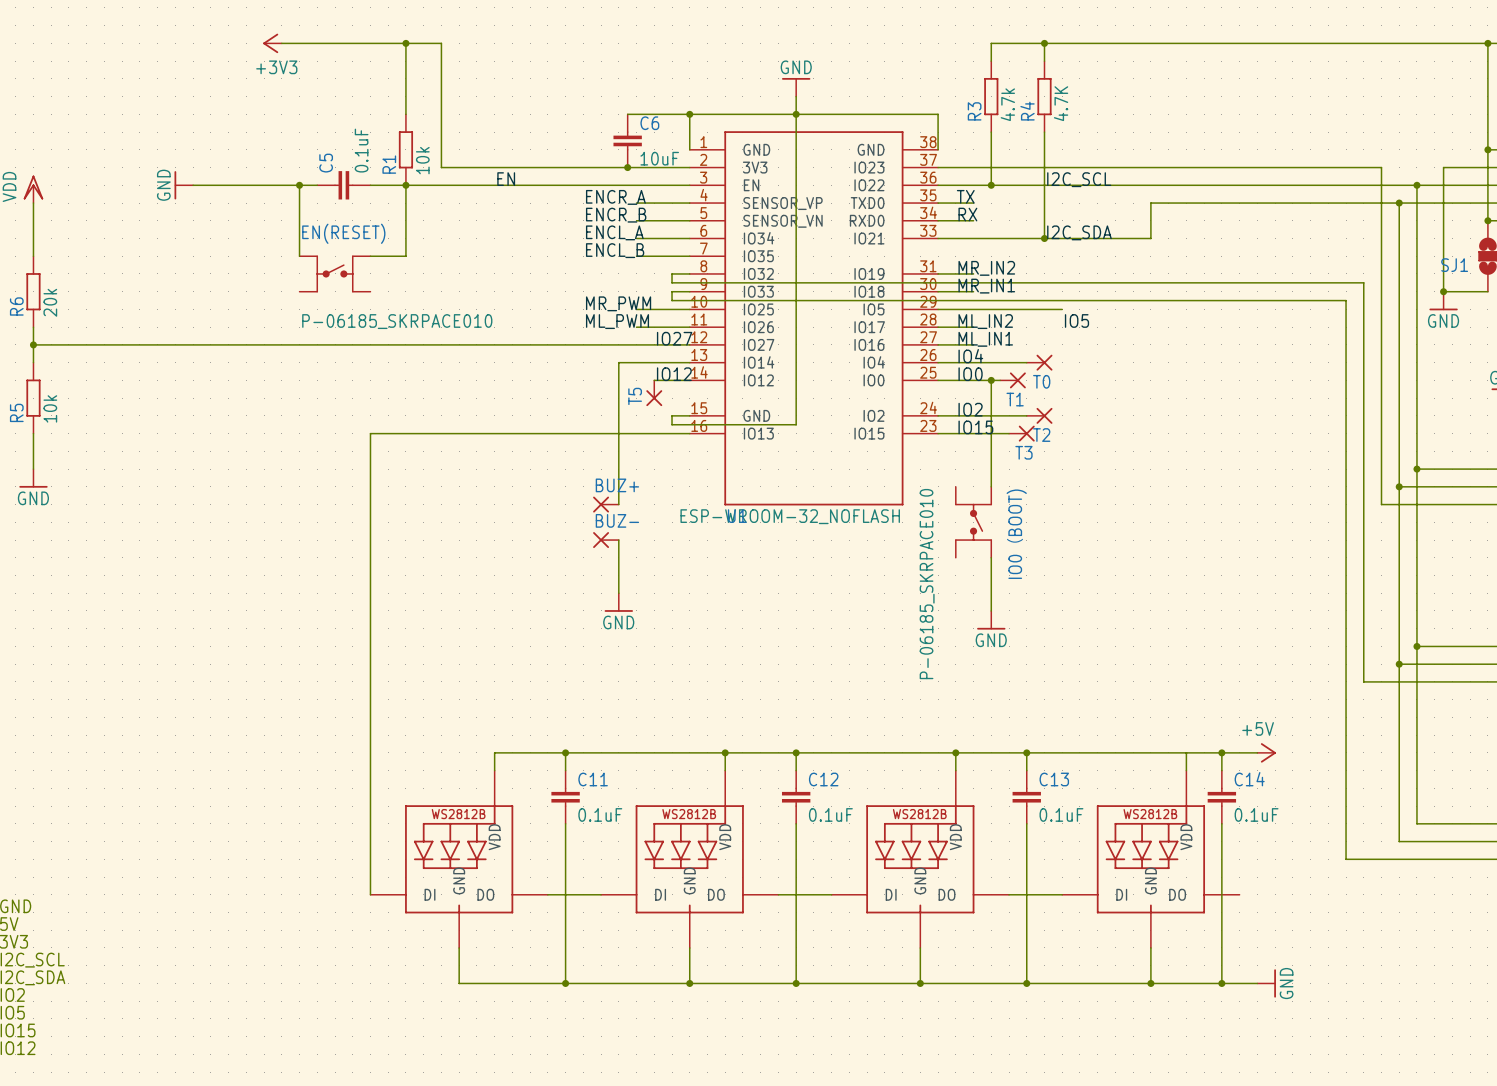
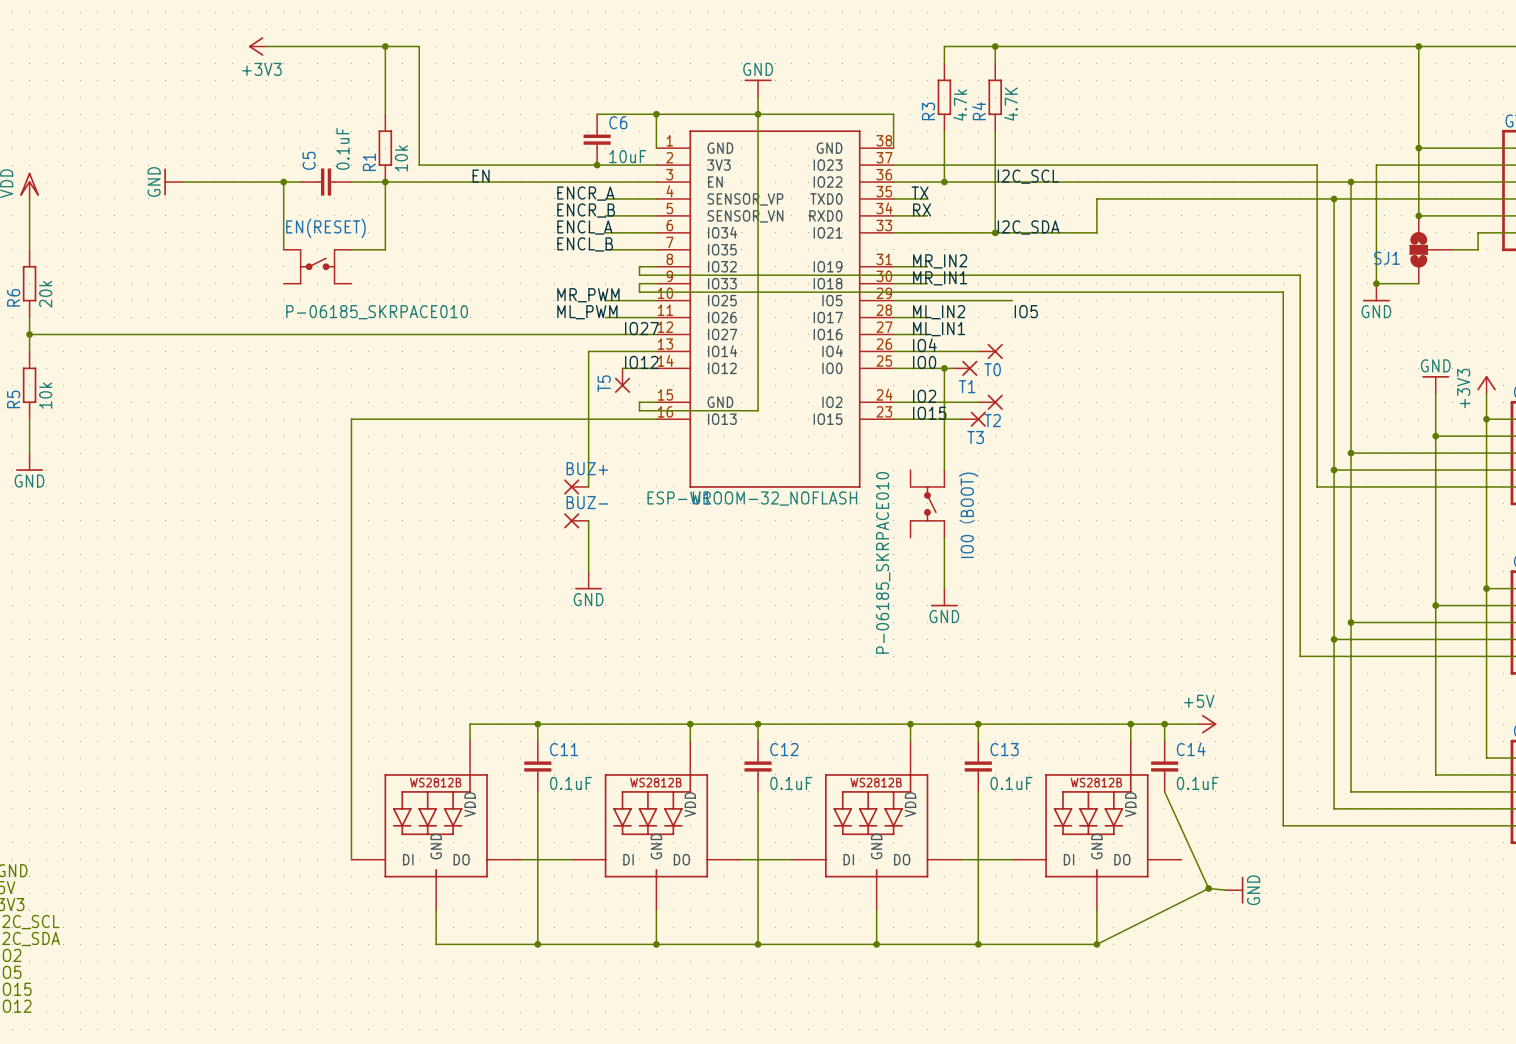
junction: none -> (1130, 724)
wire: (1221, 823) (1221, 983) -> (1164, 791) (1208, 888)
wire: none -> (1208, 888) (1225, 890)
junction: none -> (1208, 888)
wire: (1150, 983) (1257, 983) -> (1096, 944) (1208, 888)
junction: (1221, 983) -> none
power symbol position: GND (1266, 983) -> GND (1234, 890)

